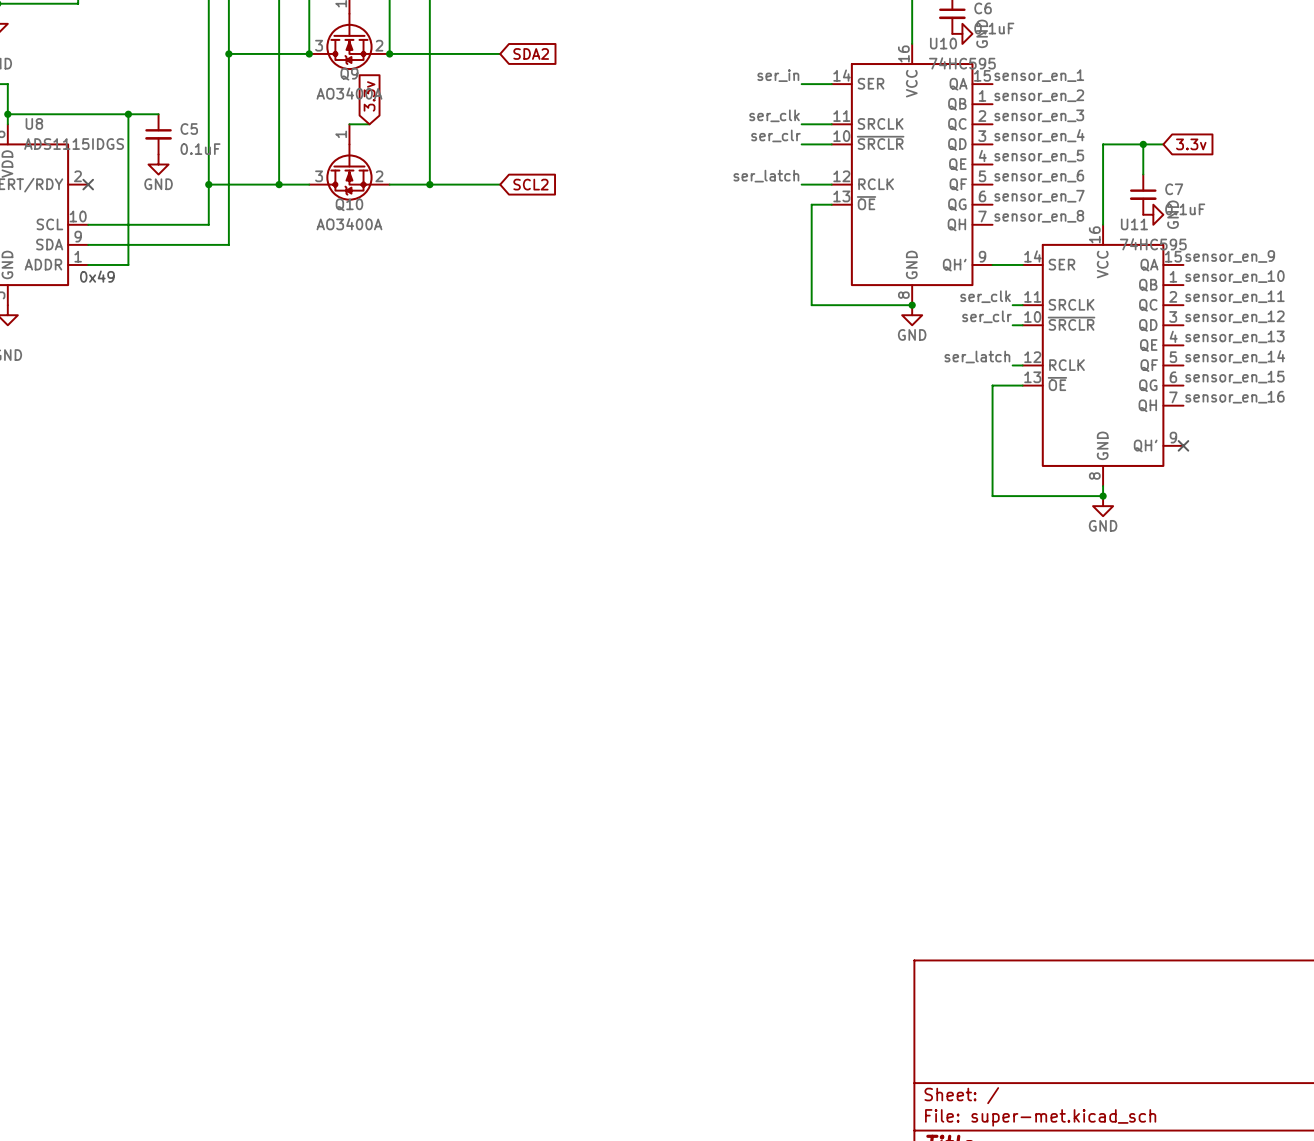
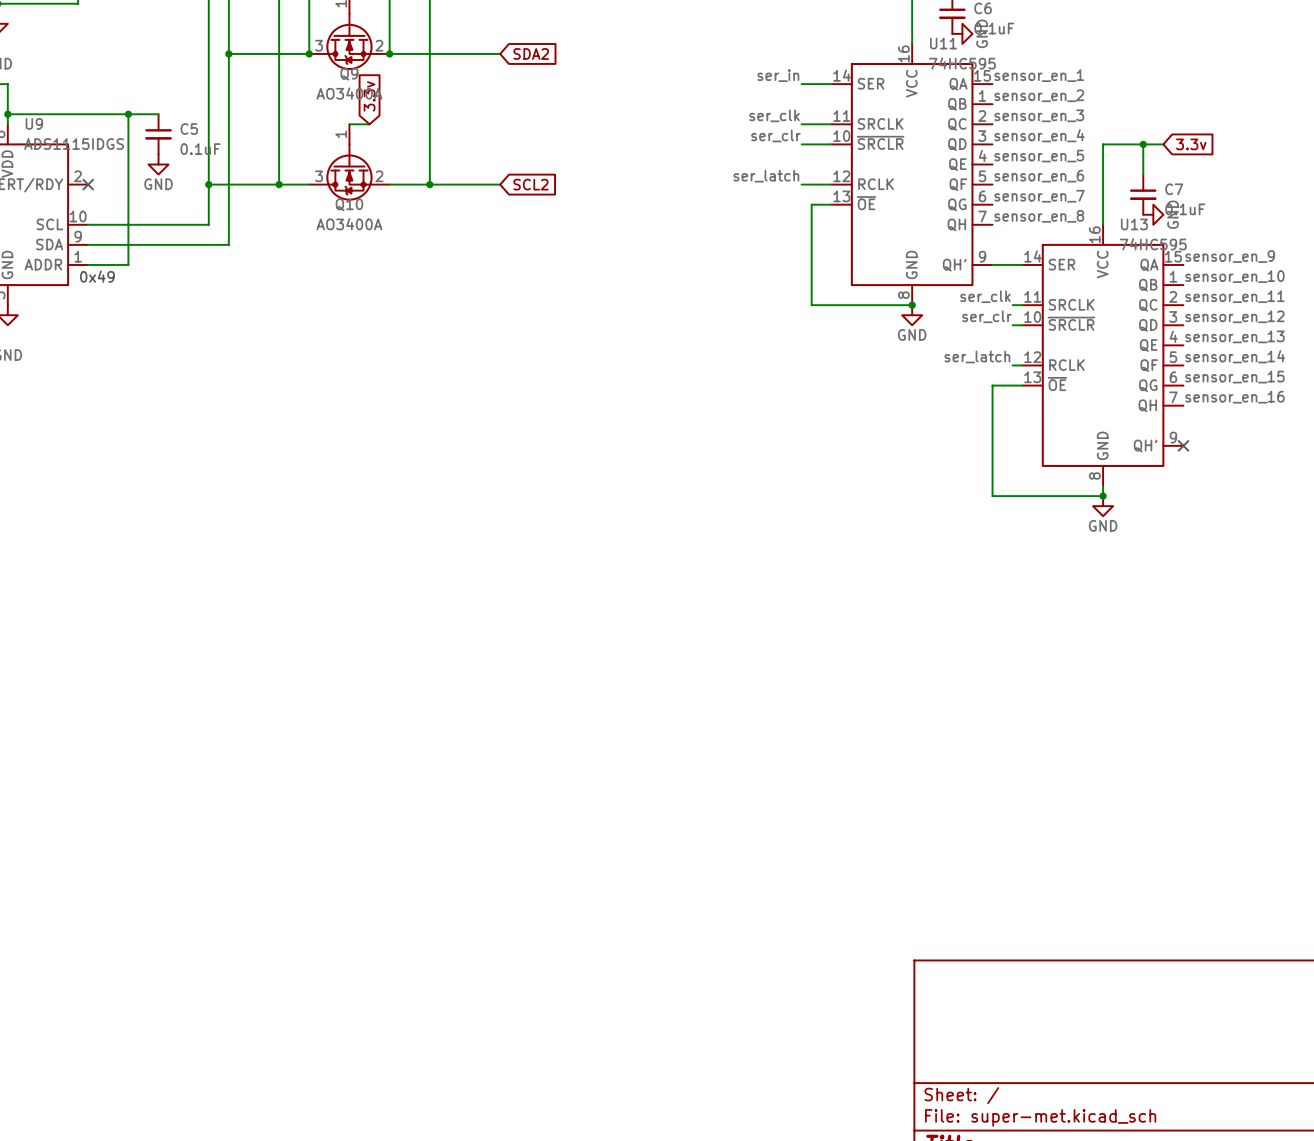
U10 name: U10 (943, 43) -> U11 (943, 43)
U8 name: U8 (34, 123) -> U9 (34, 123)
U11 name: U11 (1134, 224) -> U13 (1134, 224)

